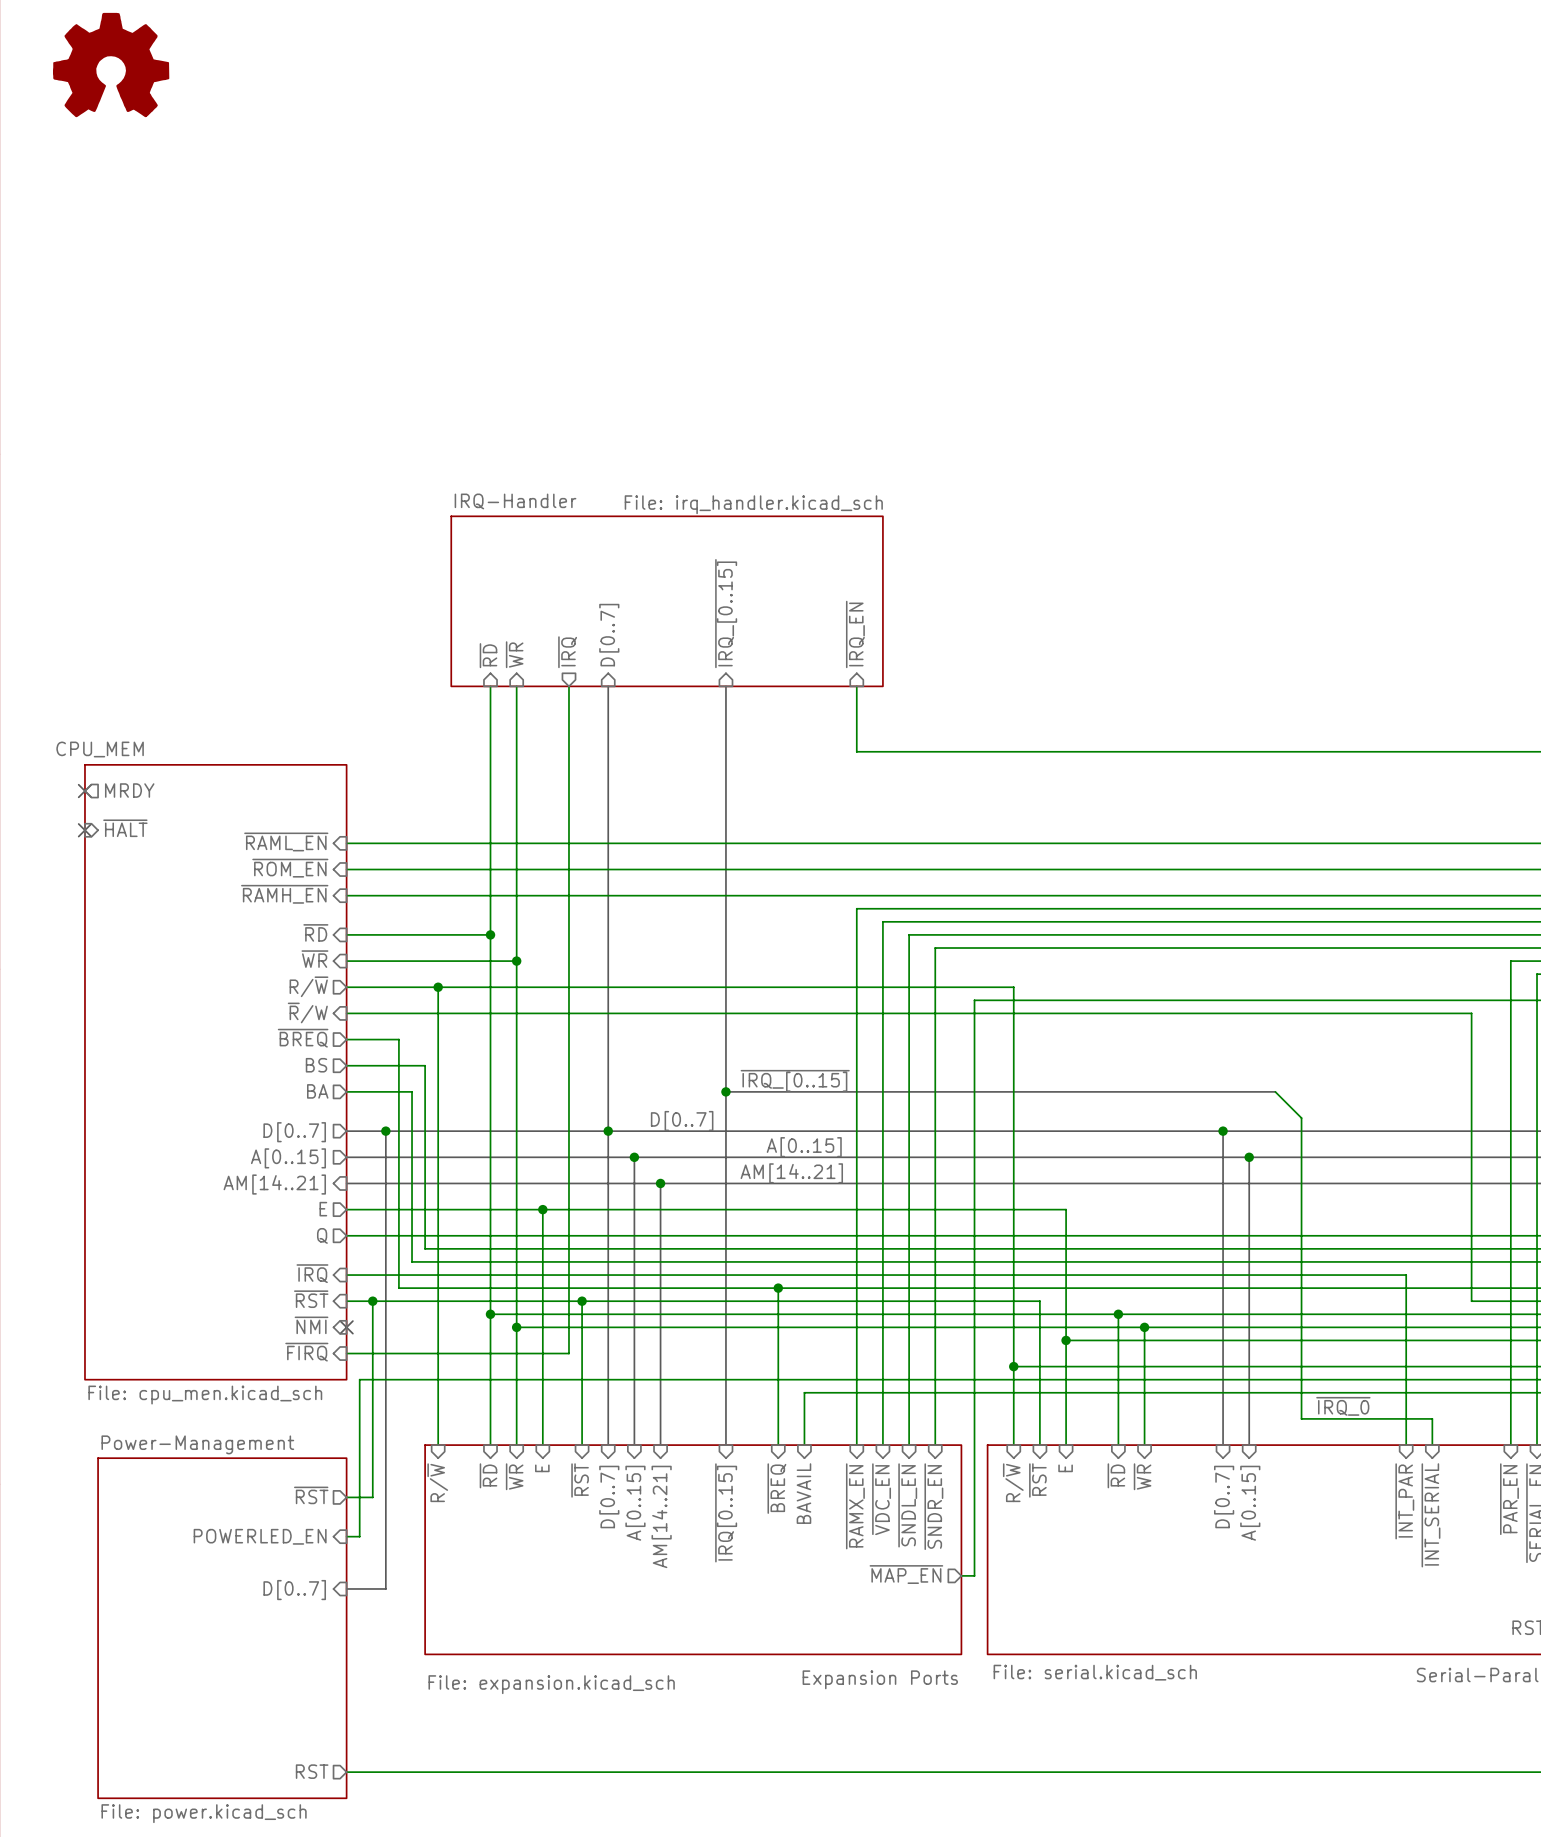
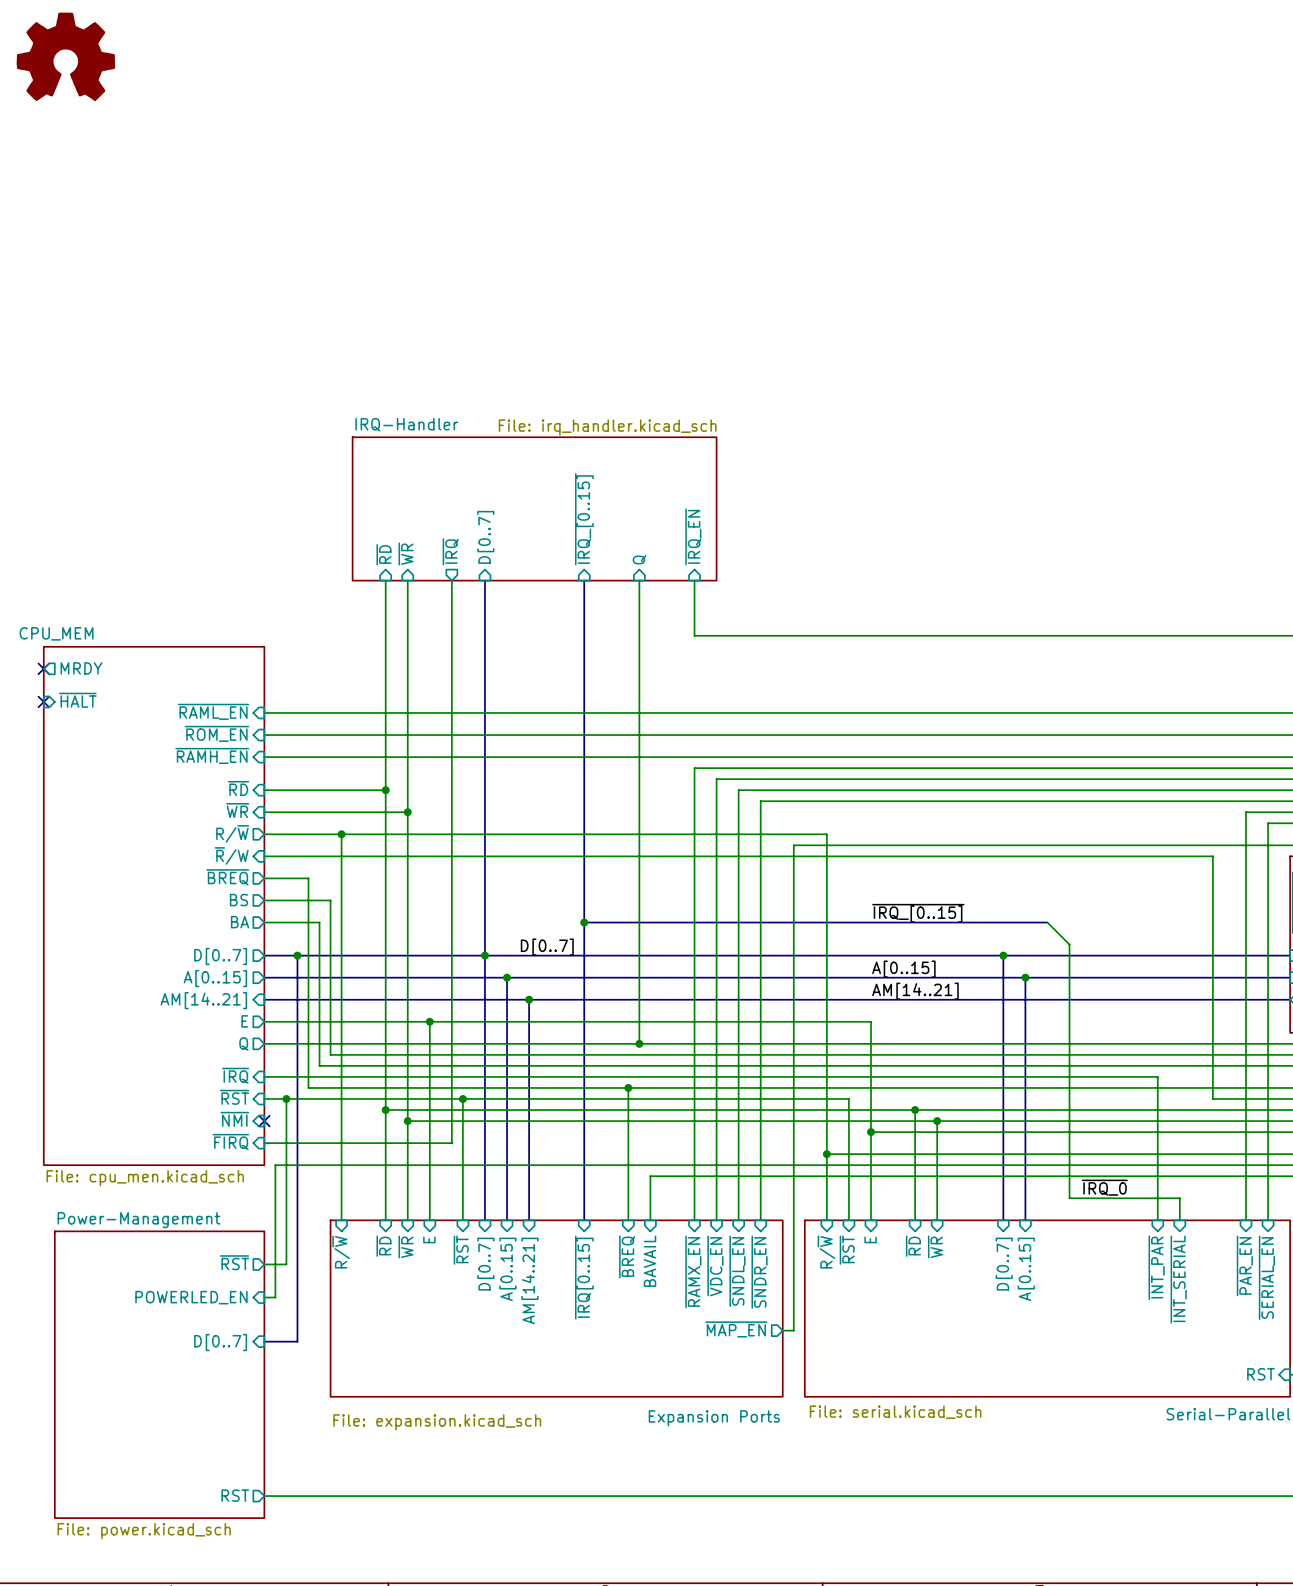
sheet pin: none -> Q (639, 559)
wire: none -> (639, 580) (639, 1043)
label: ~{IRQ_[0..15]} (795, 1080) -> none
label: none -> ~{IRQ_[0..15]} (918, 913)
label: A[0..15] (804, 1147) -> none
label: none -> A[0..15] (903, 969)
label: AM[14..21] (791, 1173) -> none
label: none -> AM[14..21] (915, 991)
junction: none -> (639, 1043)

